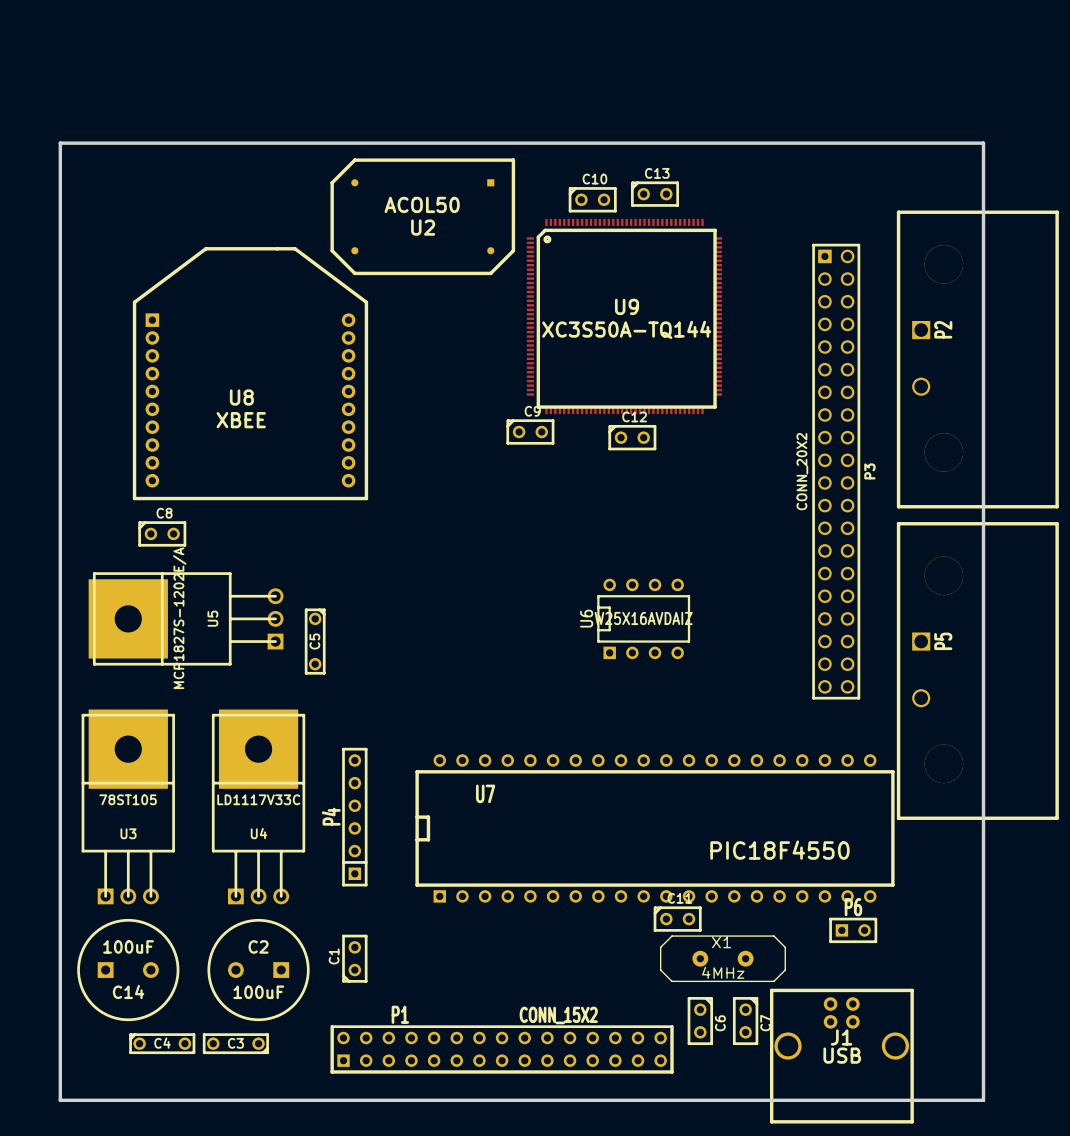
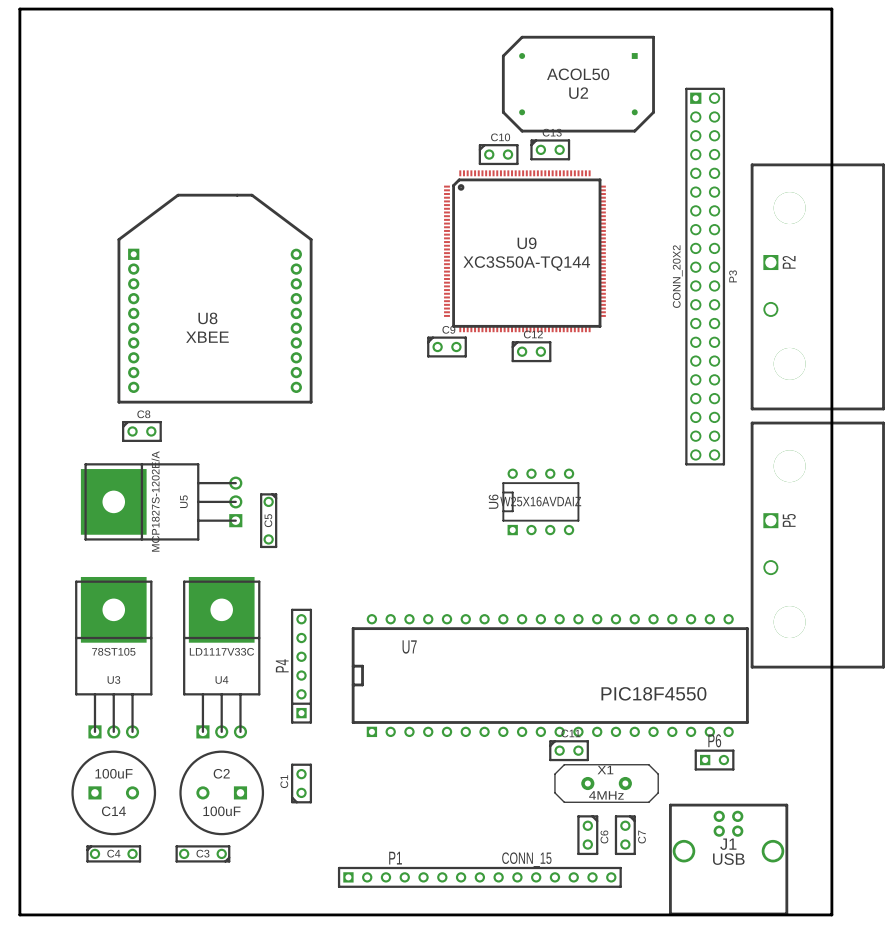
board edge: (60, 143) (983, 143) (983, 1100) (60, 1100) (60, 143) -> (19, 9) (19, 914) (831, 914) (831, 9) (19, 9)
U2 position: (422, 216) -> (578, 84)
P3 position: (836, 471) -> (705, 276)
P1 value: CONN_15X2 (558, 1015) -> CONN_15 (526, 859)
P1 footprint: [330, 1024, 674, 1074] -> [337, 866, 622, 888]
C4 position: (162, 1043) -> (113, 853)
J1 position: (841, 1056) -> (728, 859)

